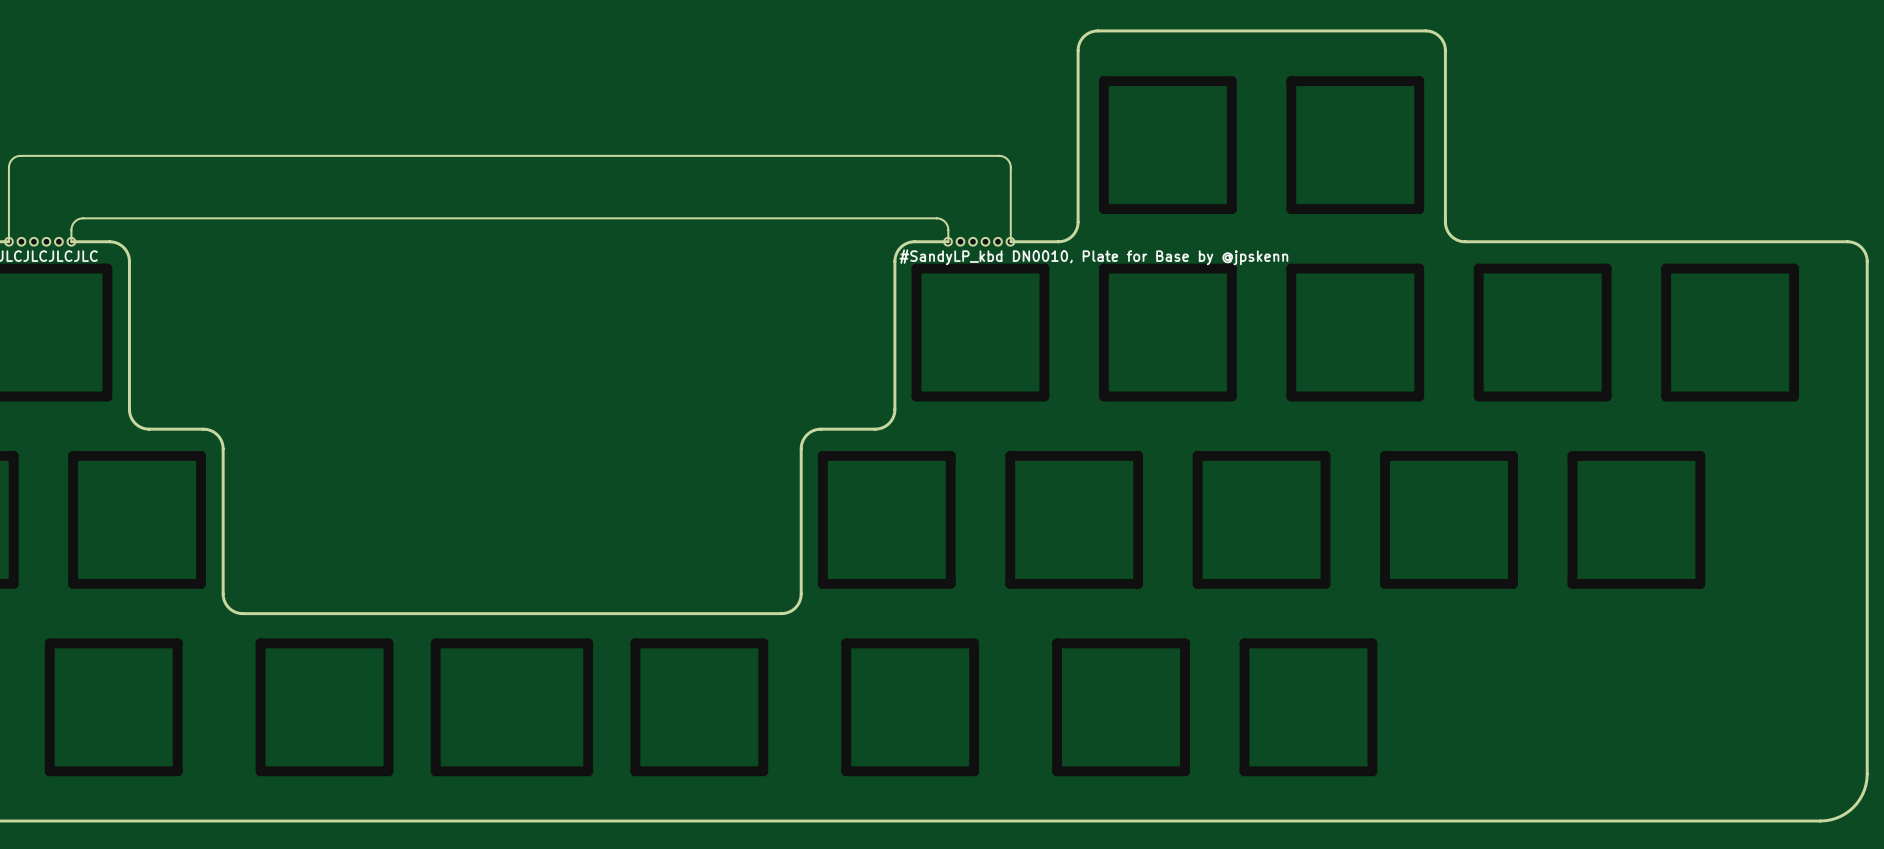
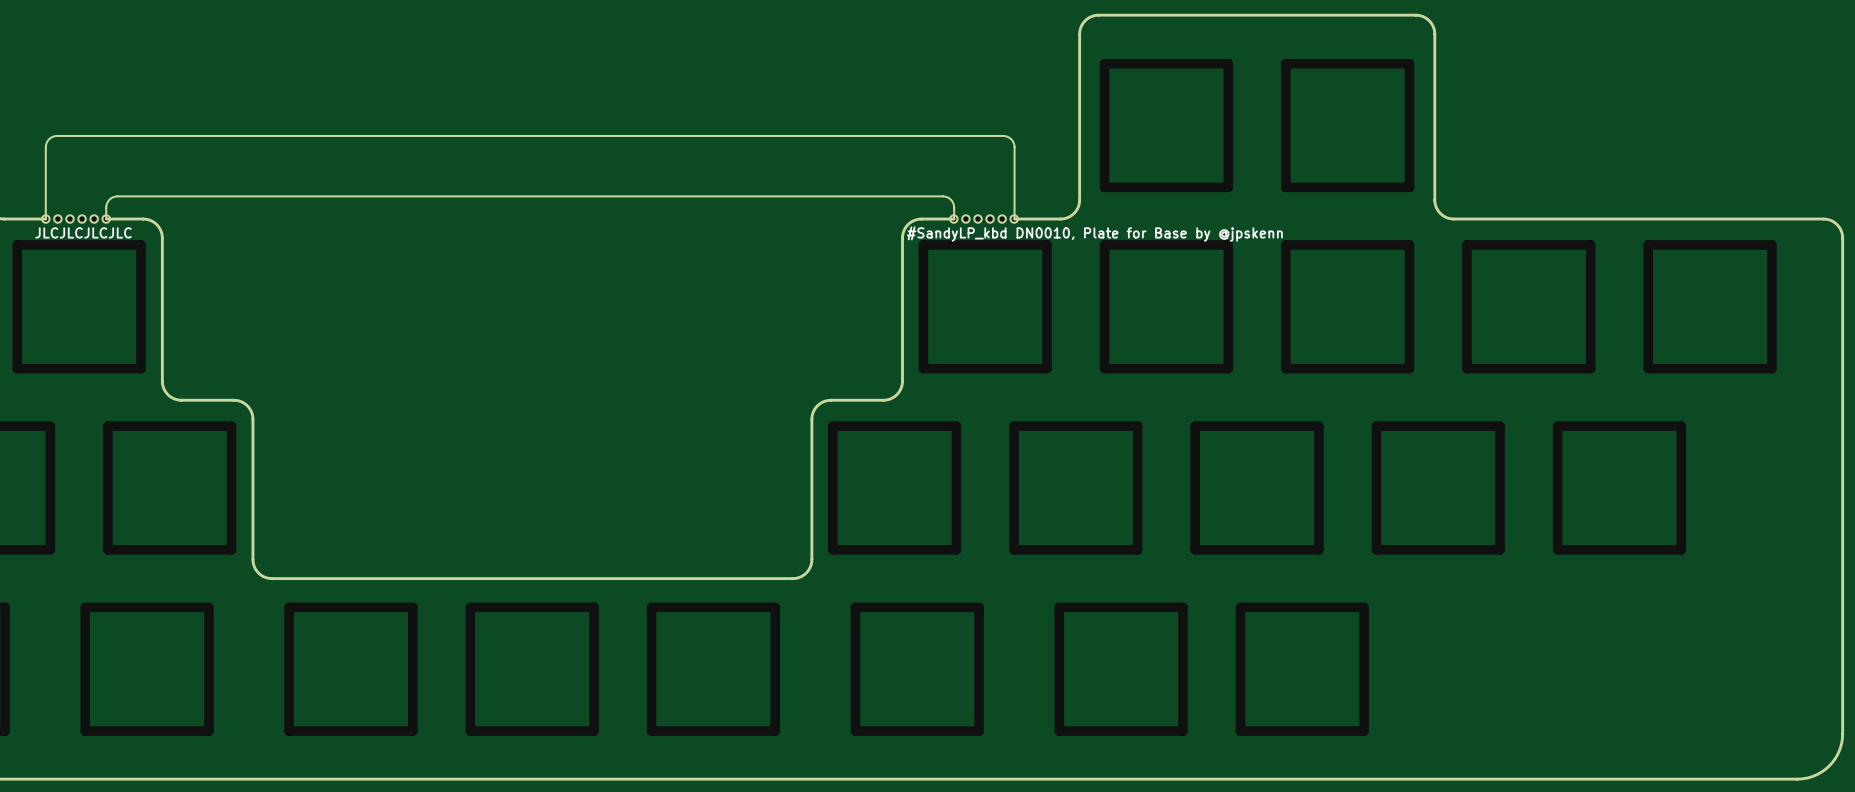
part footprint: [430, 638, 594, 777] -> [465, 602, 599, 736]

